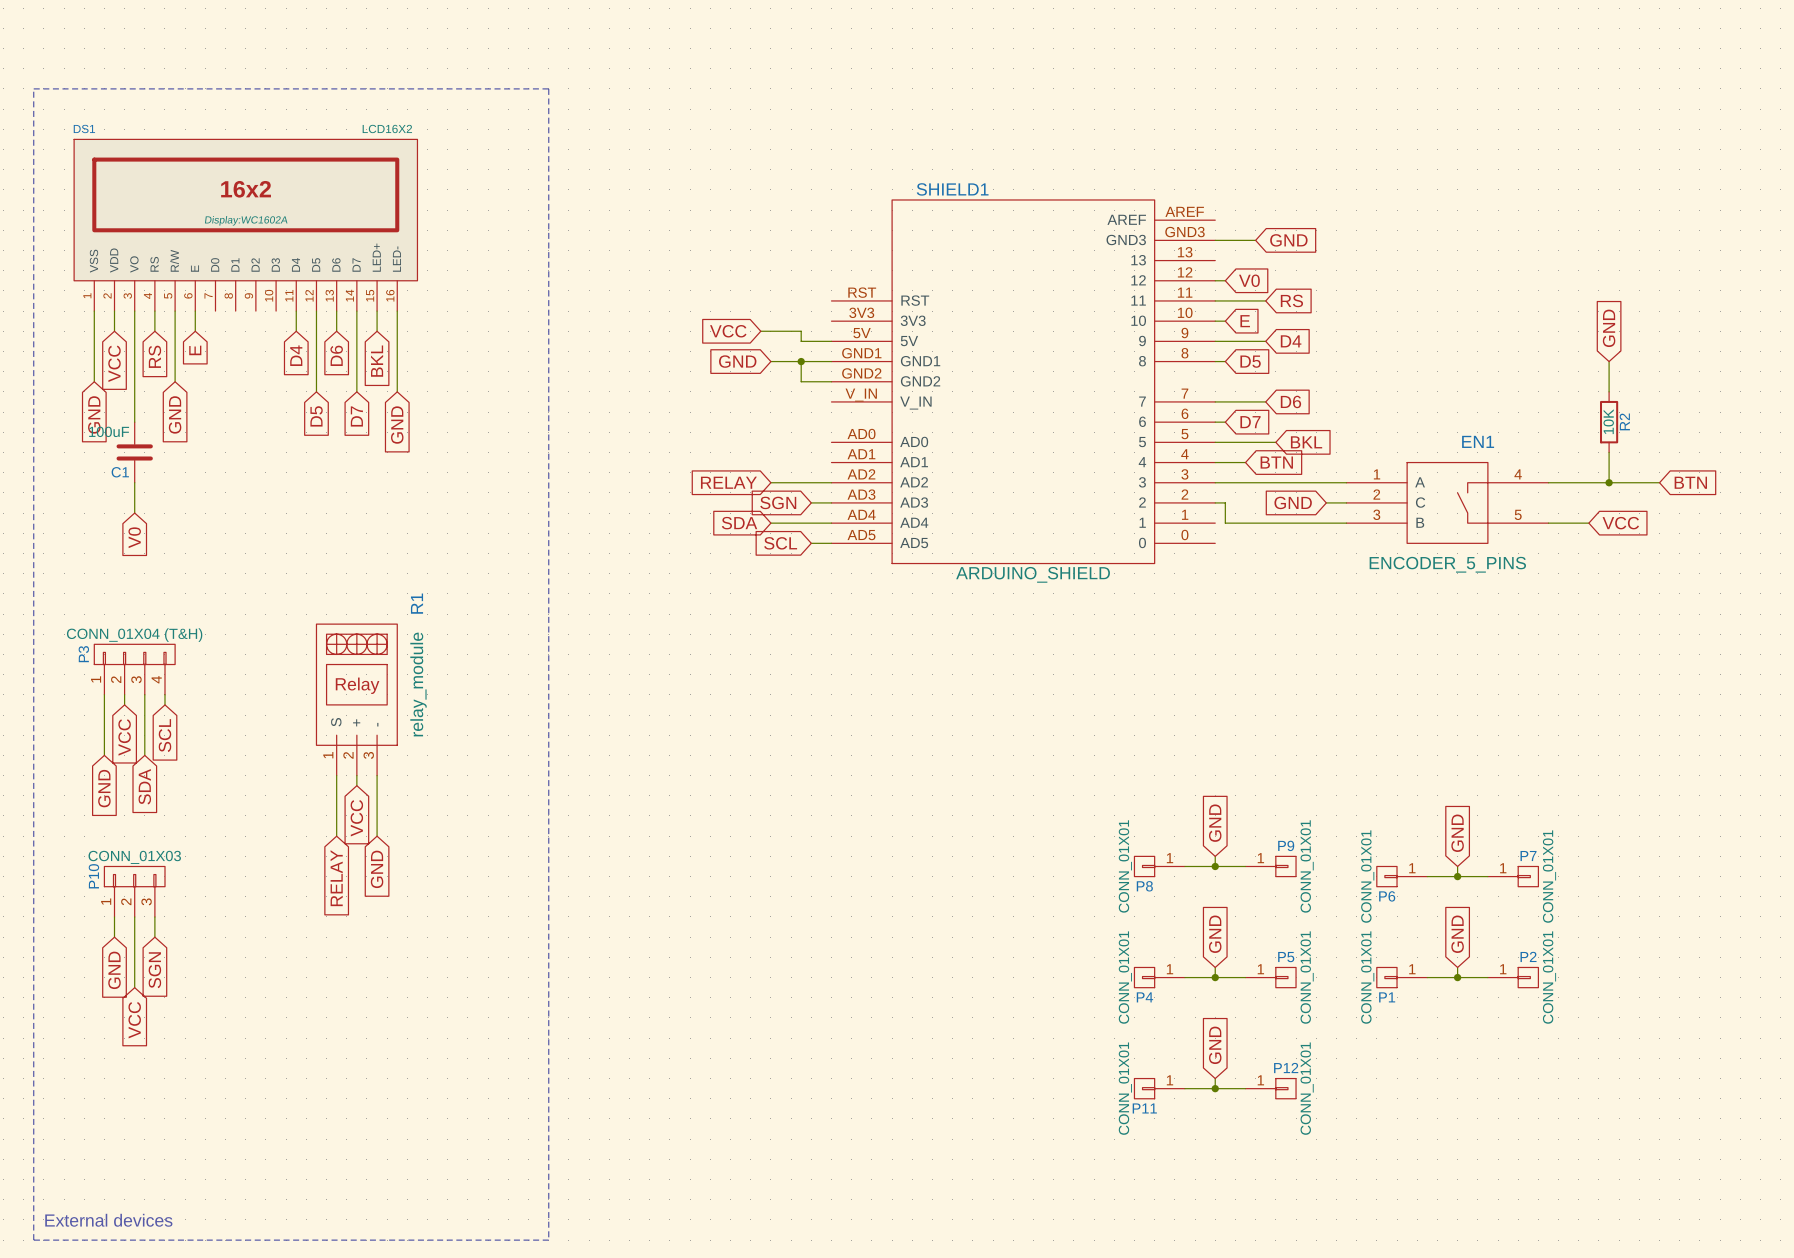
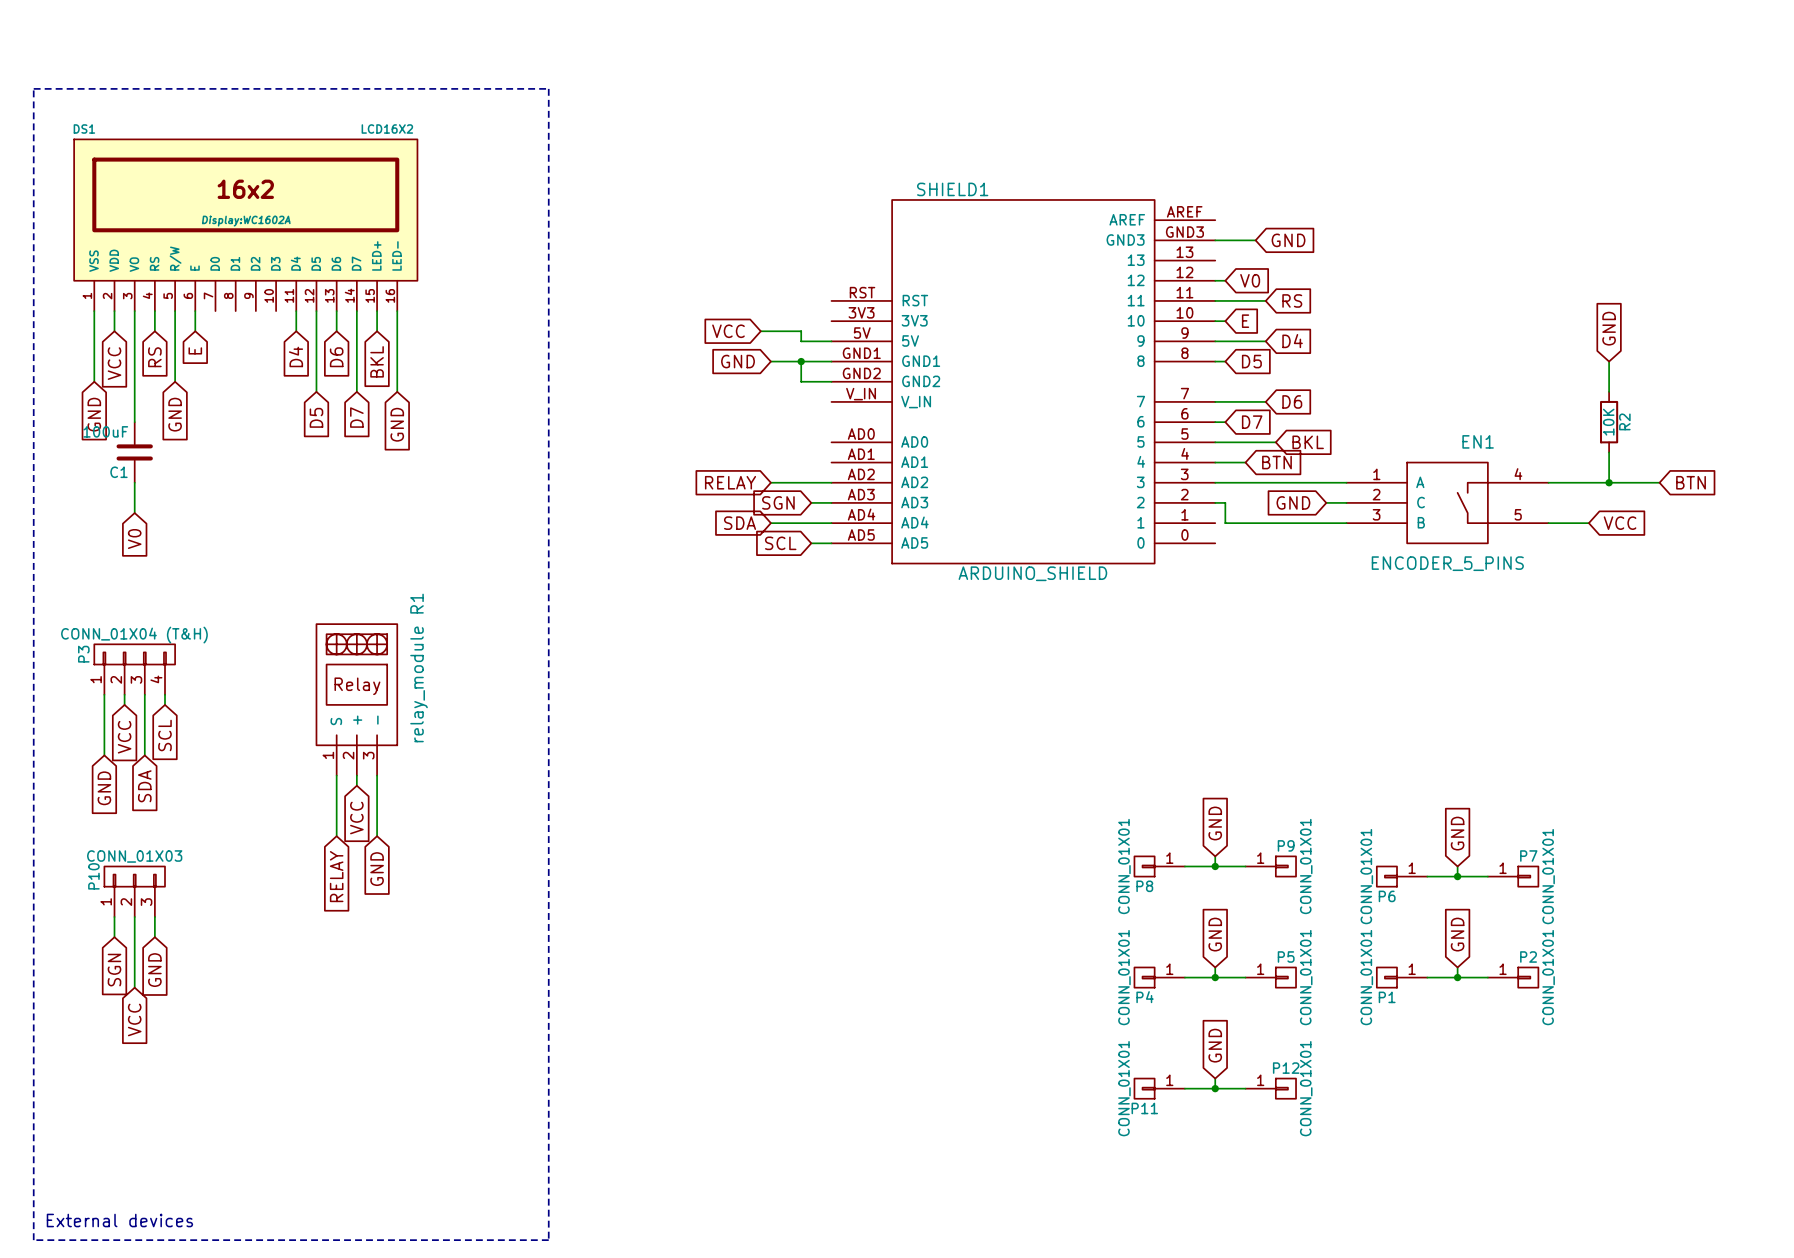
global label: GND (114, 970) -> SGN (114, 970)
global label: SGN (154, 970) -> GND (154, 970)

